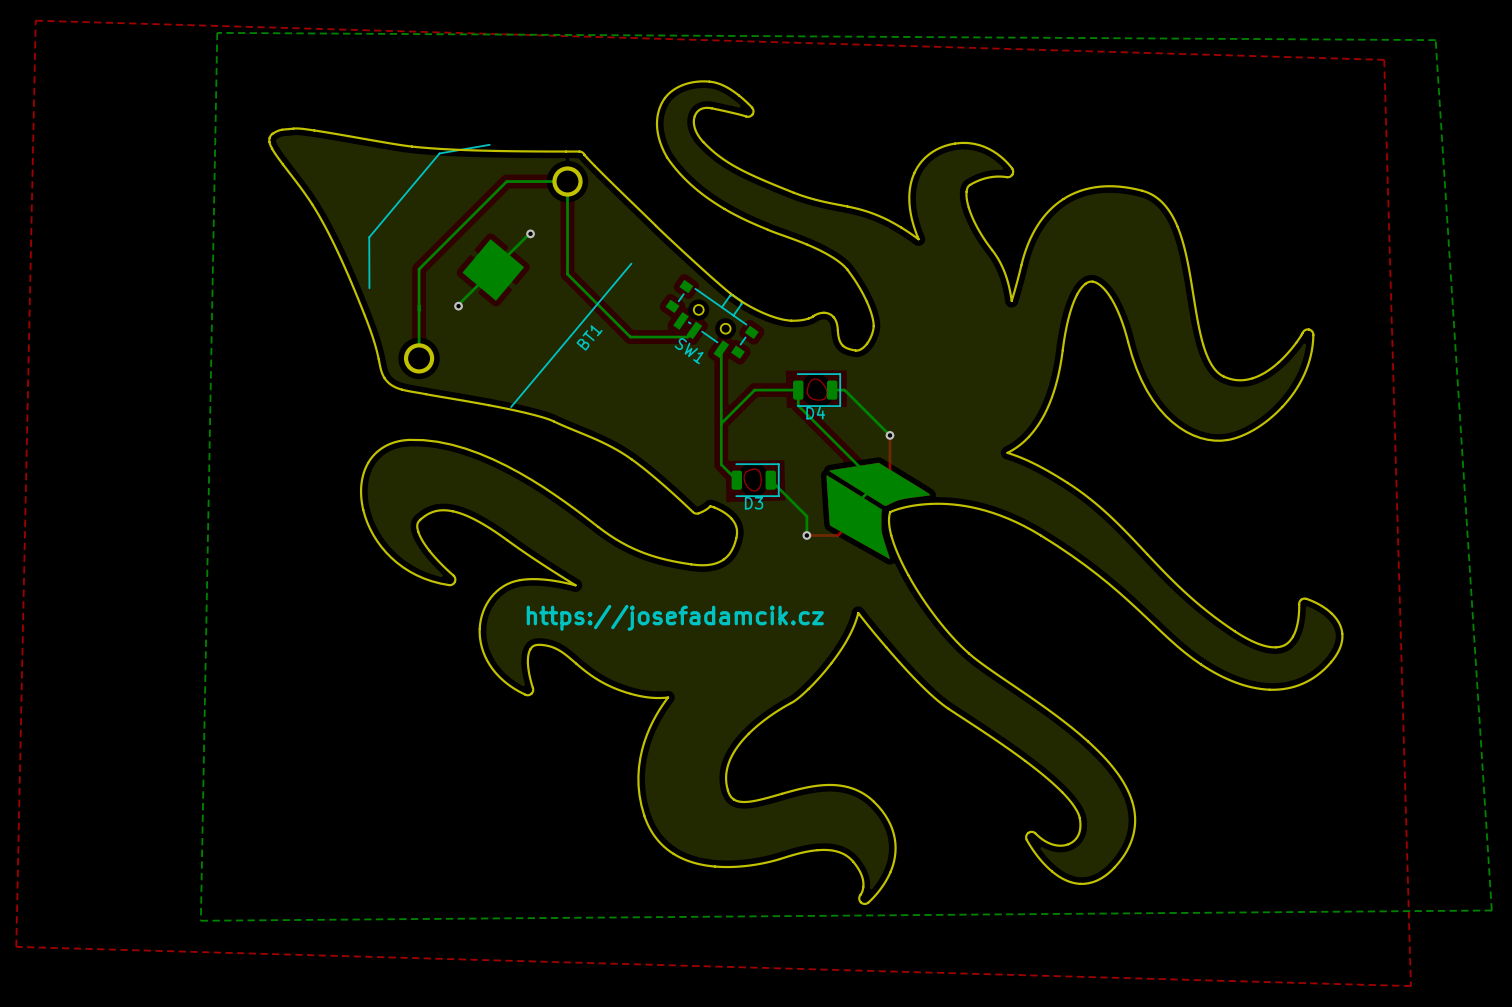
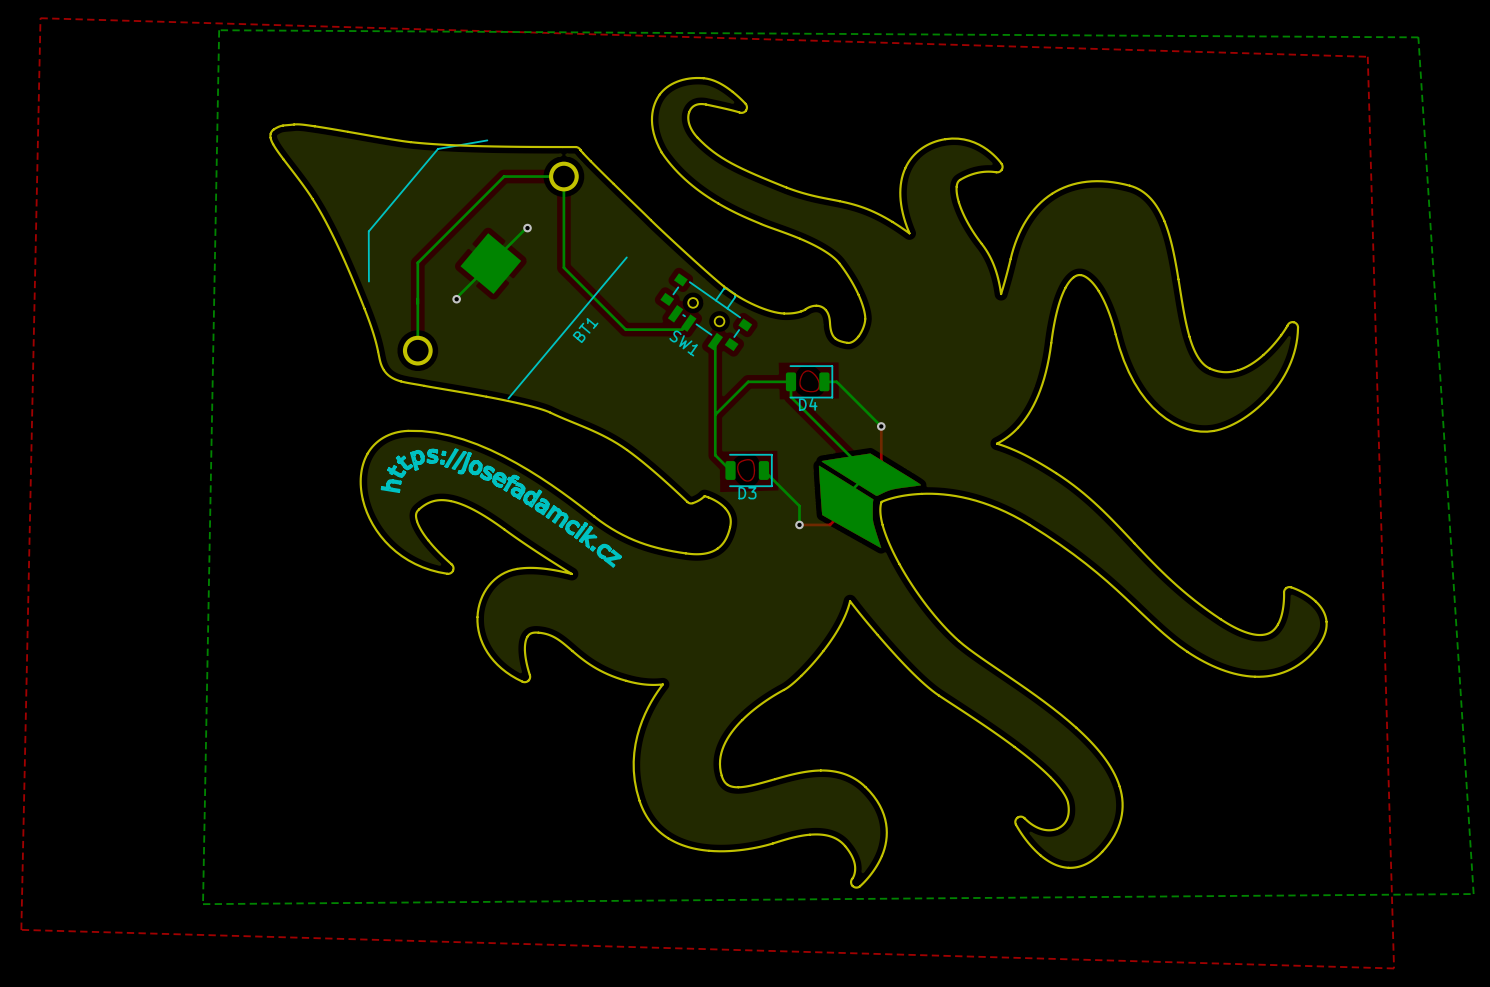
line: none -> (455, 449) (445, 466) (447, 466) (457, 450) (455, 449)
line: none -> (433, 449) (437, 450) (436, 452) (431, 451) (430, 453) (436, 456) (437, 460) (433, 462) (427, 461) (427, 459) (435, 459) (428, 454) (429, 450) (433, 449)
line: none -> (416, 451) (421, 452) (423, 459) (421, 463) (415, 462) (417, 469) (415, 469) (411, 453) (413, 454) (416, 451)
line: none -> (443, 451) (442, 454) (444, 454) (445, 452) (443, 451)
line: none -> (463, 452) (452, 468) (454, 468) (465, 452) (463, 452)
line: none -> (416, 452) (421, 456) (419, 462) (414, 458) (416, 452)
line: none -> (468, 452) (467, 455) (469, 456) (470, 453) (468, 452)
line: none -> (403, 456) (401, 460) (406, 465) (411, 466) (408, 468) (398, 461) (398, 456) (400, 459) (403, 456)
line: none -> (467, 457) (462, 470) (458, 472) (464, 471) (469, 458) (467, 457)
line: none -> (441, 460) (443, 461) (443, 463) (441, 463) (441, 460)
line: none -> (473, 461) (469, 469) (472, 473) (476, 474) (480, 470) (481, 465) (478, 461) (473, 461)
line: none -> (477, 463) (474, 463) (472, 466) (473, 472) (478, 469) (477, 463)
line: none -> (394, 466) (393, 470) (401, 474) (405, 472) (402, 476) (390, 473) (388, 470) (389, 468) (392, 469) (394, 466)
line: none -> (487, 466) (493, 469) (493, 471) (486, 469) (491, 476) (487, 479) (480, 476) (481, 474) (488, 477) (484, 470) (487, 466)
line: none -> (497, 473) (502, 473) (505, 477) (504, 482) (495, 478) (495, 482) (502, 485) (501, 486) (493, 481) (494, 476) (497, 473)
line: none -> (499, 474) (503, 476) (503, 480) (496, 476) (499, 474)
line: none -> (513, 475) (508, 479) (510, 480) (504, 489) (506, 490) (511, 481) (514, 482) (513, 478) (518, 477) (513, 475)
line: none -> (393, 480) (400, 481) (400, 483) (390, 482) (389, 486) (399, 489) (398, 491) (381, 489) (382, 487) (388, 488) (387, 482) (393, 480)
line: none -> (516, 489) (513, 491) (515, 494) (521, 492) (516, 489)
line: none -> (521, 490) (521, 487) (516, 485) (517, 483) (523, 486) (523, 492) (519, 498) (518, 495) (514, 495) (511, 492) (514, 488) (521, 490)
line: none -> (539, 490) (541, 491) (531, 506) (530, 503) (525, 502) (524, 498) (527, 493) (532, 491) (535, 496) (539, 490)
line: none -> (530, 493) (533, 494) (534, 497) (529, 502) (526, 499) (530, 493)
line: none -> (540, 505) (537, 507) (539, 510) (545, 507) (540, 505)
line: none -> (546, 506) (545, 502) (540, 500) (541, 498) (548, 502) (547, 508) (543, 514) (542, 511) (538, 511) (535, 508) (539, 503) (545, 506)
line: none -> (553, 506) (554, 509) (559, 510) (560, 513) (564, 513) (567, 516) (561, 527) (559, 525) (564, 518) (564, 515) (560, 515) (554, 522) (553, 521) (558, 513) (557, 510) (554, 510) (548, 517) (546, 516) (553, 506)
line: none -> (572, 521) (566, 528) (567, 531) (572, 534) (573, 532) (568, 529) (569, 525) (573, 522) (578, 526) (579, 525) (572, 521)
line: none -> (585, 523) (587, 524) (585, 526) (583, 525) (585, 523)
line: none -> (582, 526) (584, 528) (576, 538) (575, 536) (582, 526)
line: none -> (590, 526) (580, 540) (581, 541) (585, 537) (588, 547) (587, 537) (596, 537) (585, 536) (592, 528) (590, 526)
line: none -> (603, 544) (597, 551) (599, 555) (603, 558) (604, 556) (600, 553) (601, 549) (605, 546) (609, 550) (610, 549) (603, 544)
line: none -> (592, 546) (590, 548) (592, 550) (594, 548) (592, 546)
line: none -> (613, 550) (612, 551) (618, 556) (605, 560) (613, 566) (614, 565) (608, 560) (620, 556) (613, 550)
text: https://josefadamcik.cz (675, 617) -> none

